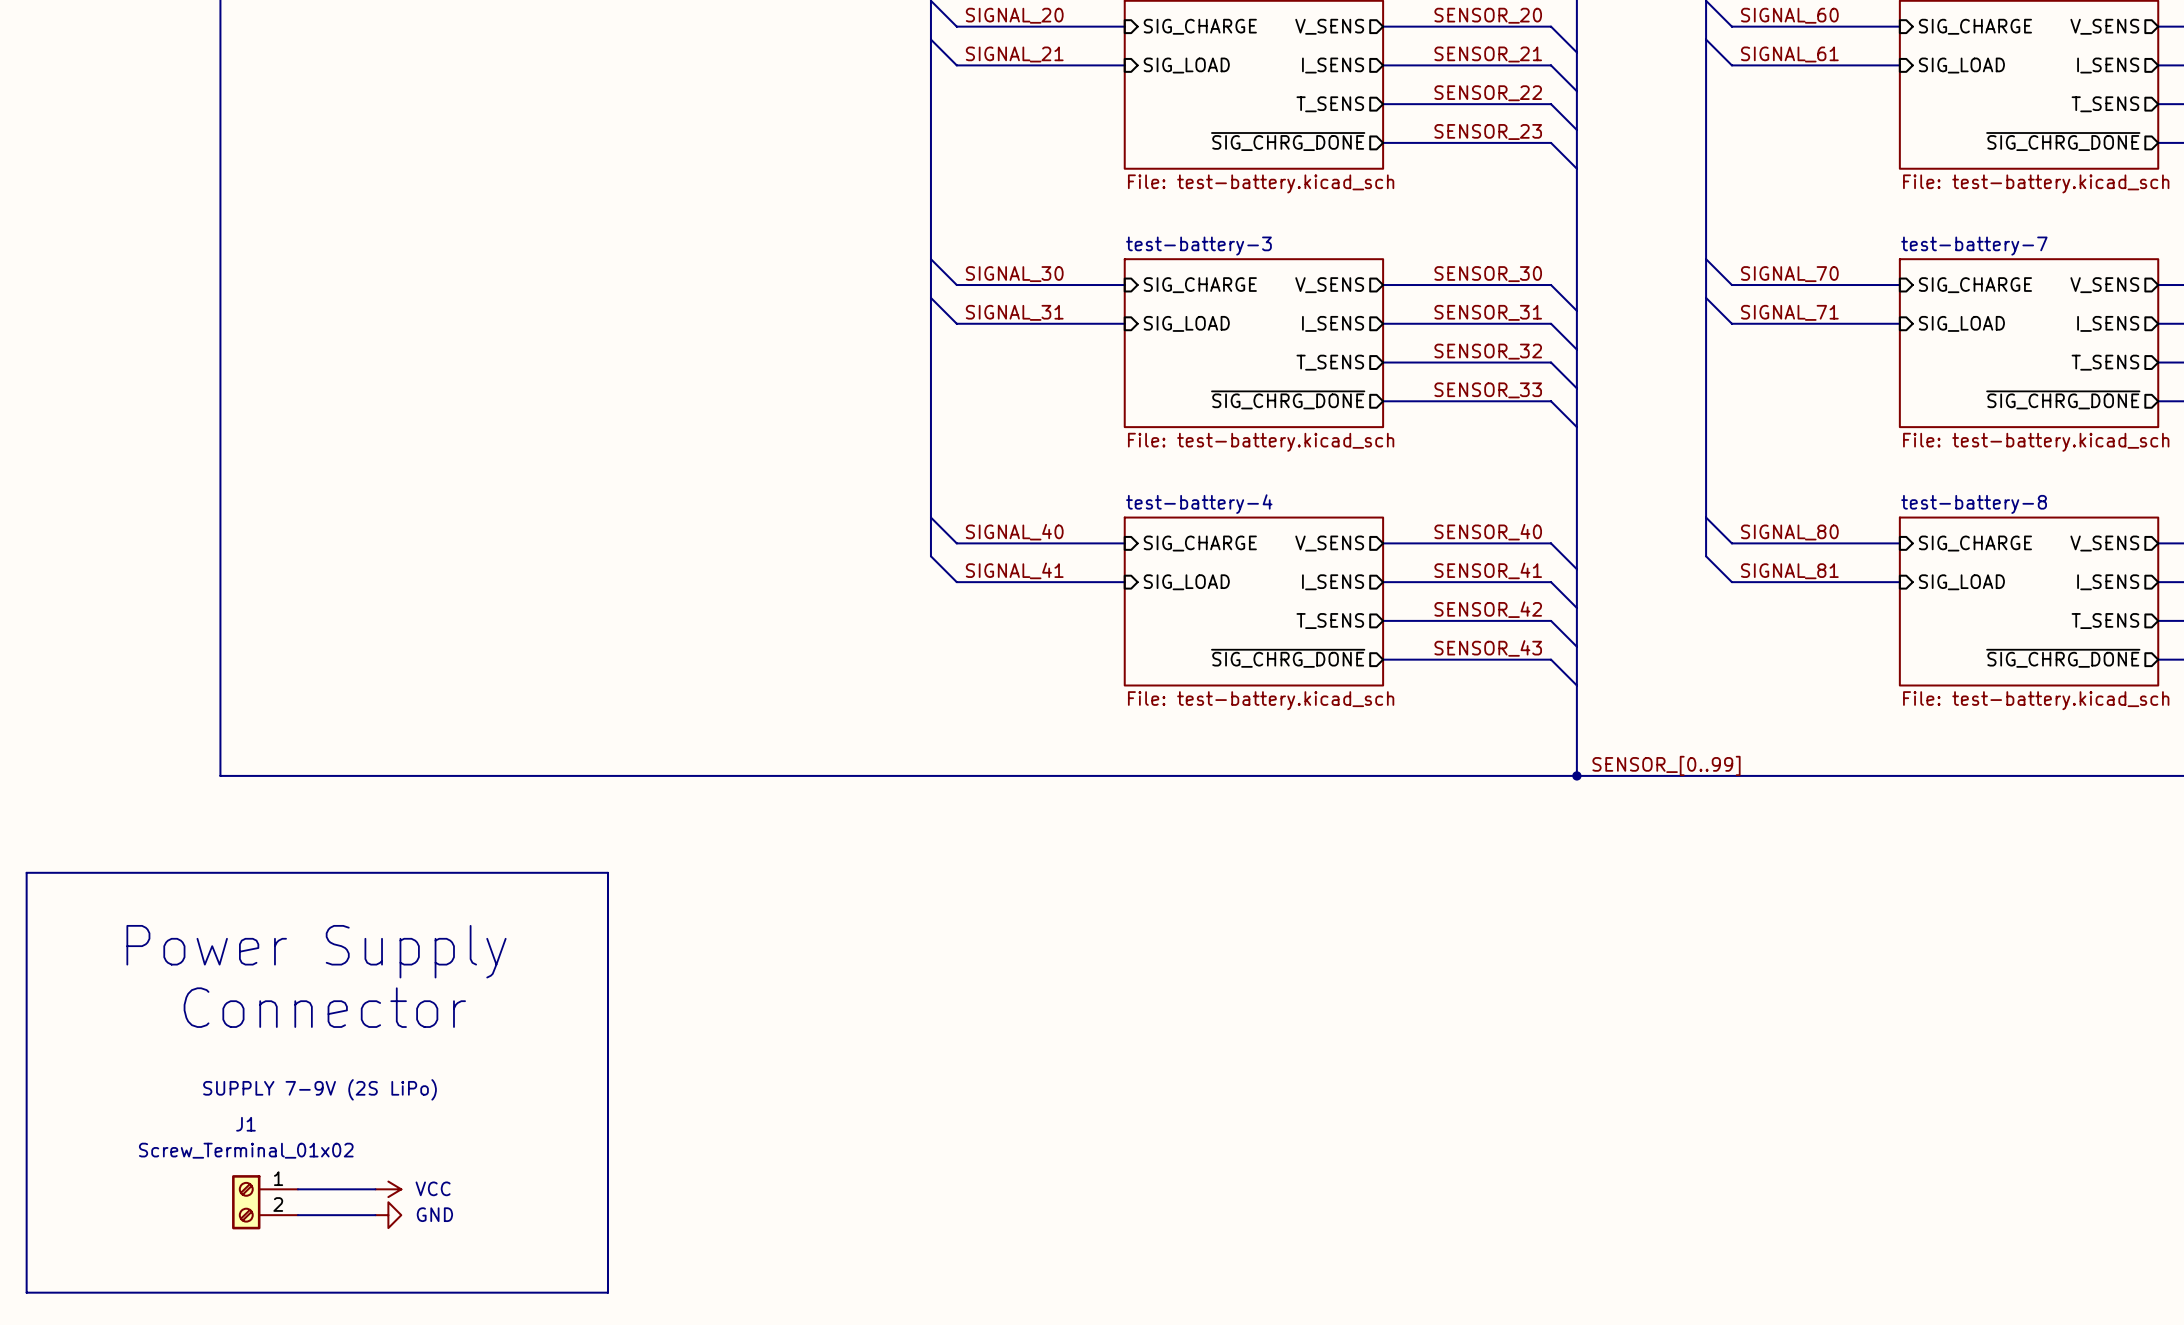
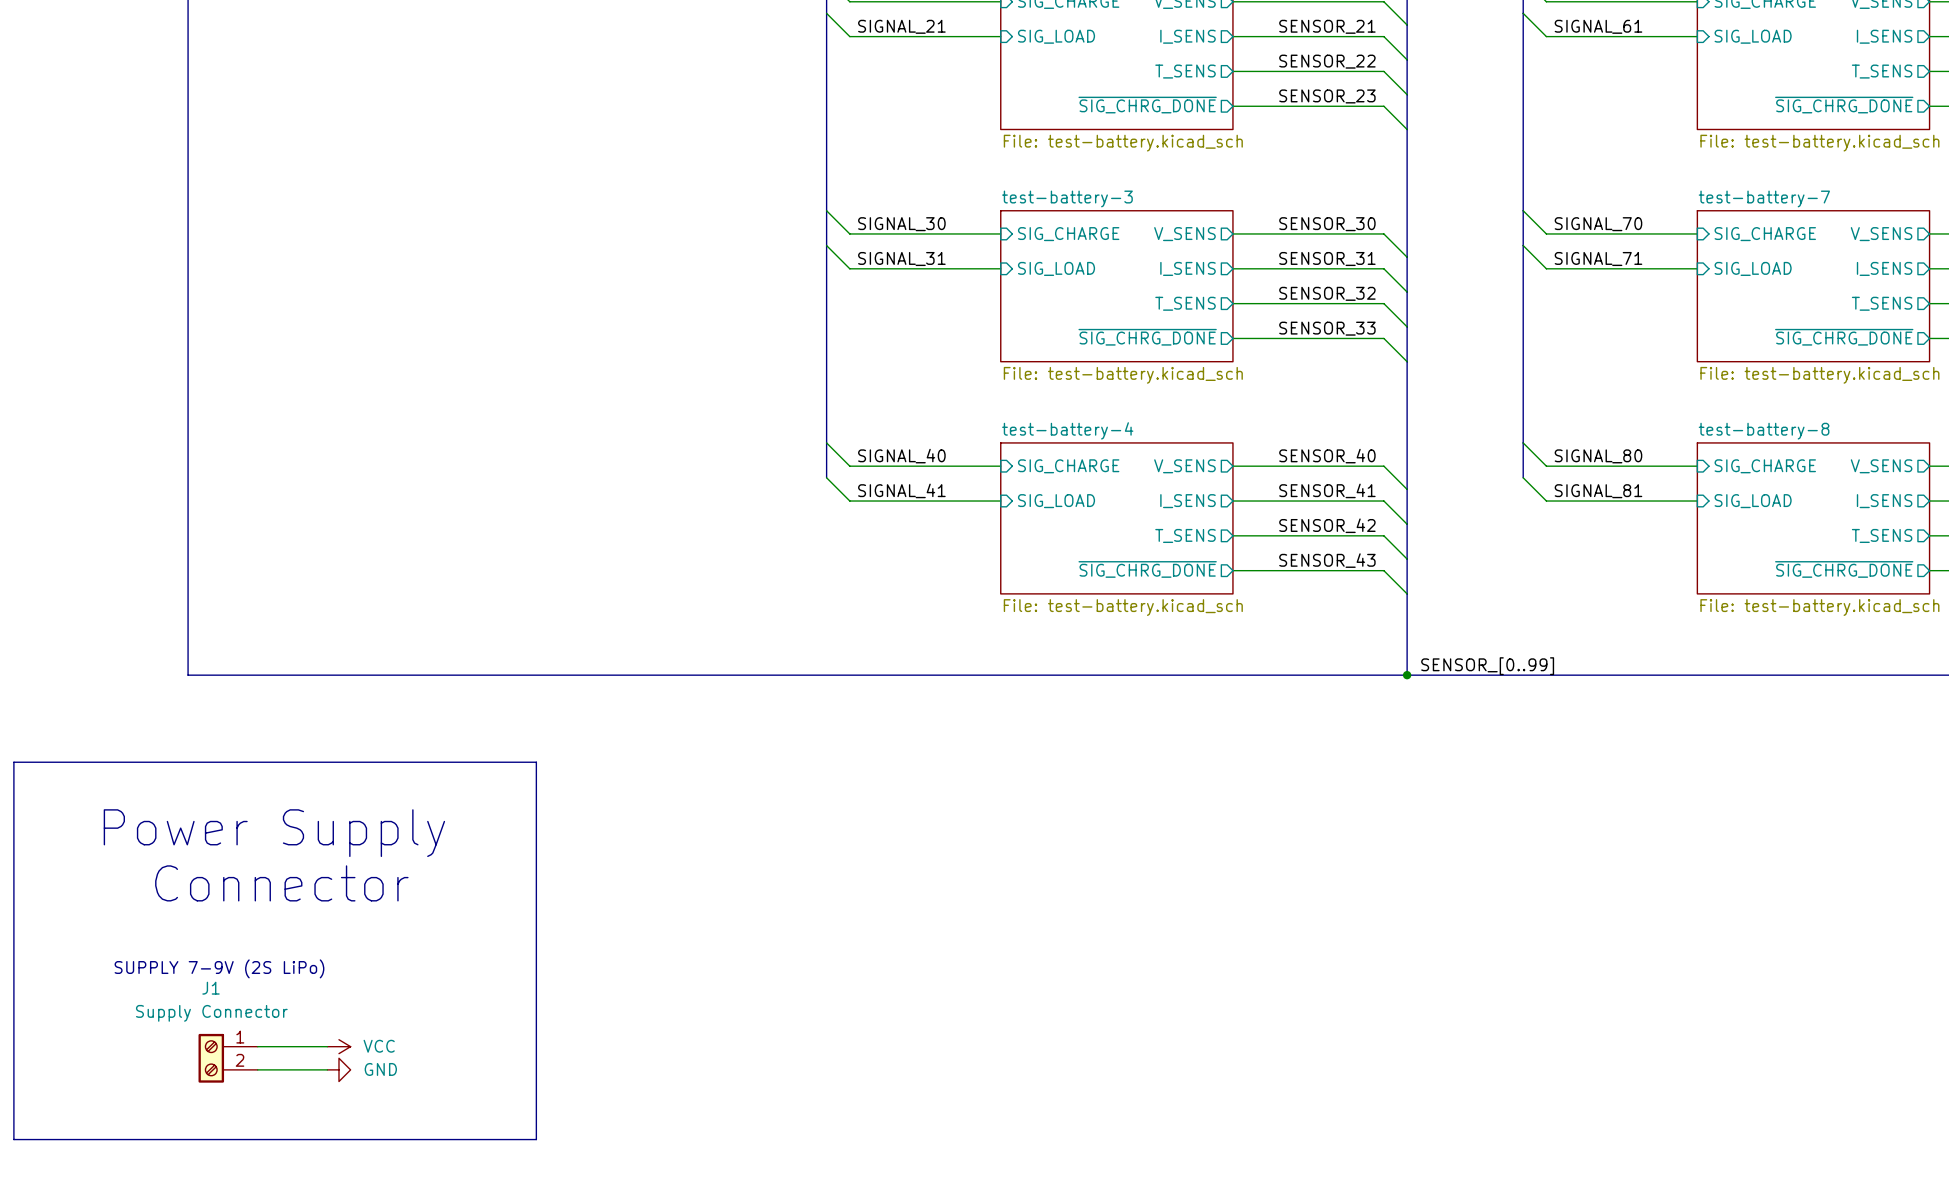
text position: SUPPLY 7-9V (2S LiPo) (319, 1089) -> SUPPLY 7-9V (2S LiPo) (219, 968)
J1 value: Screw_Terminal_01x02 (246, 1150) -> Supply Connector (211, 1013)

